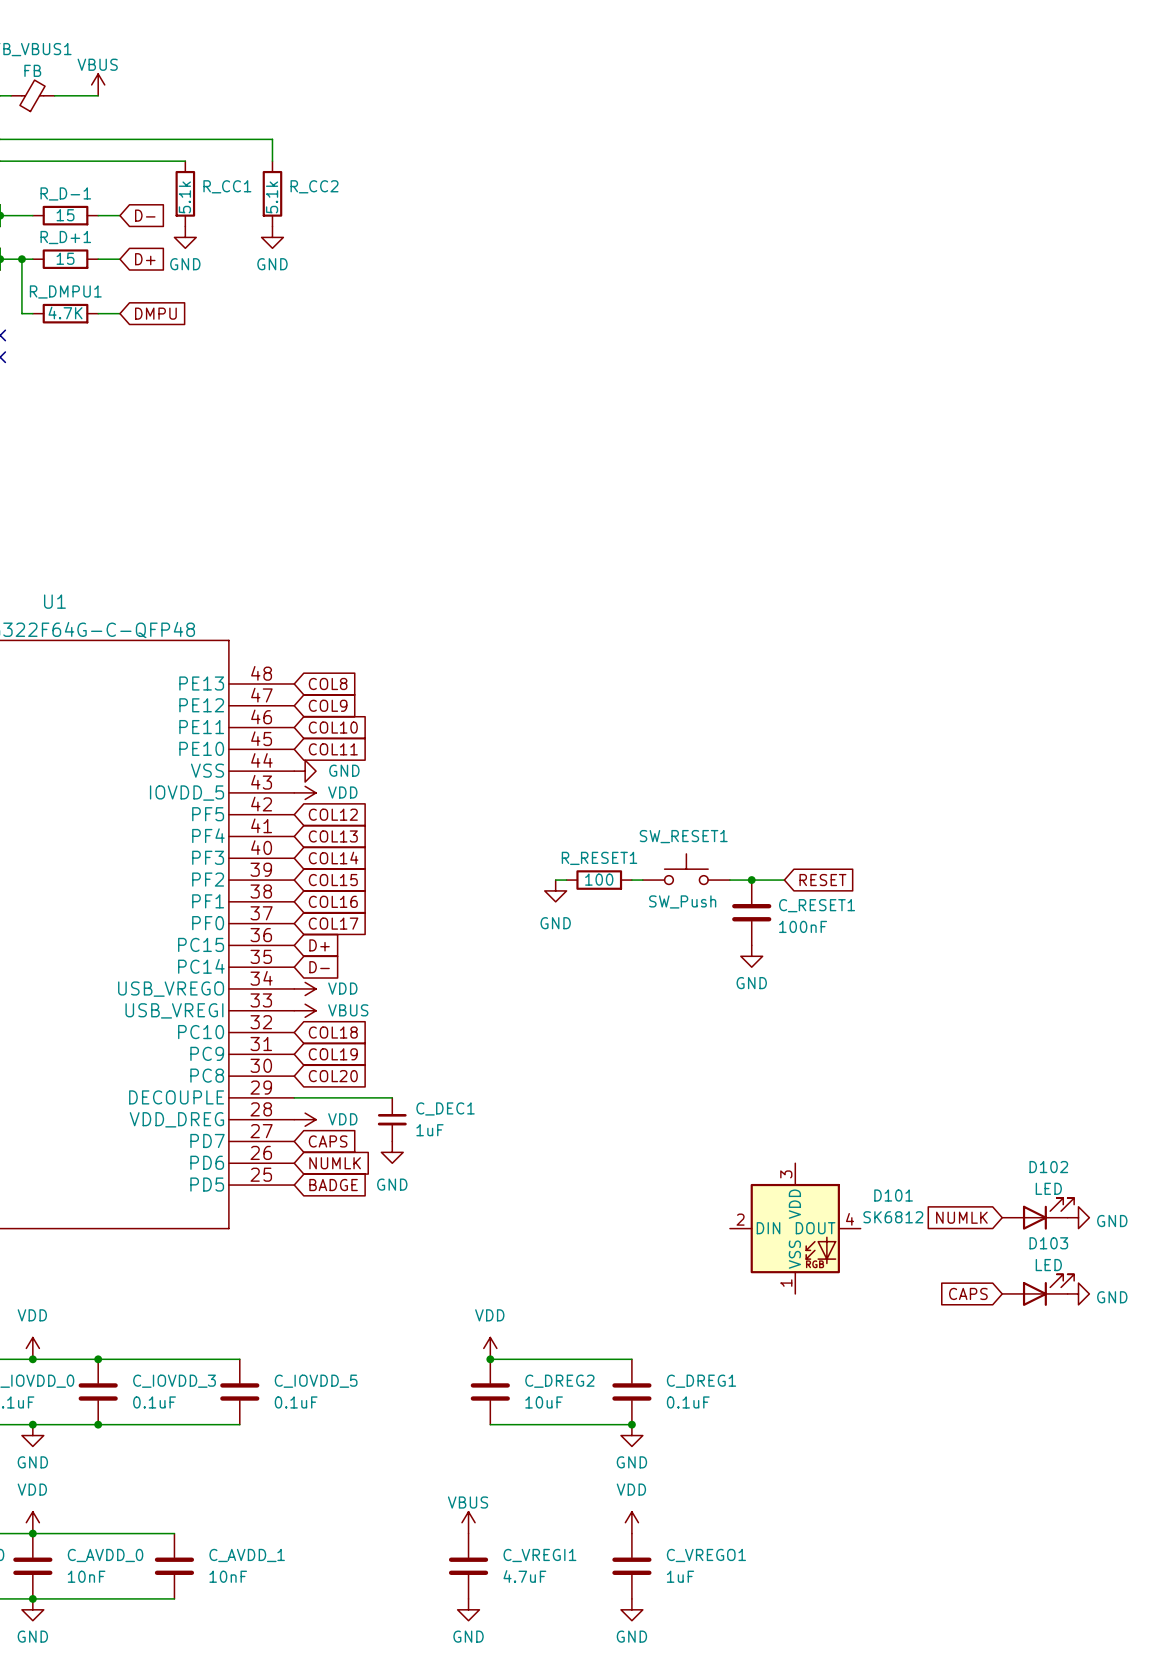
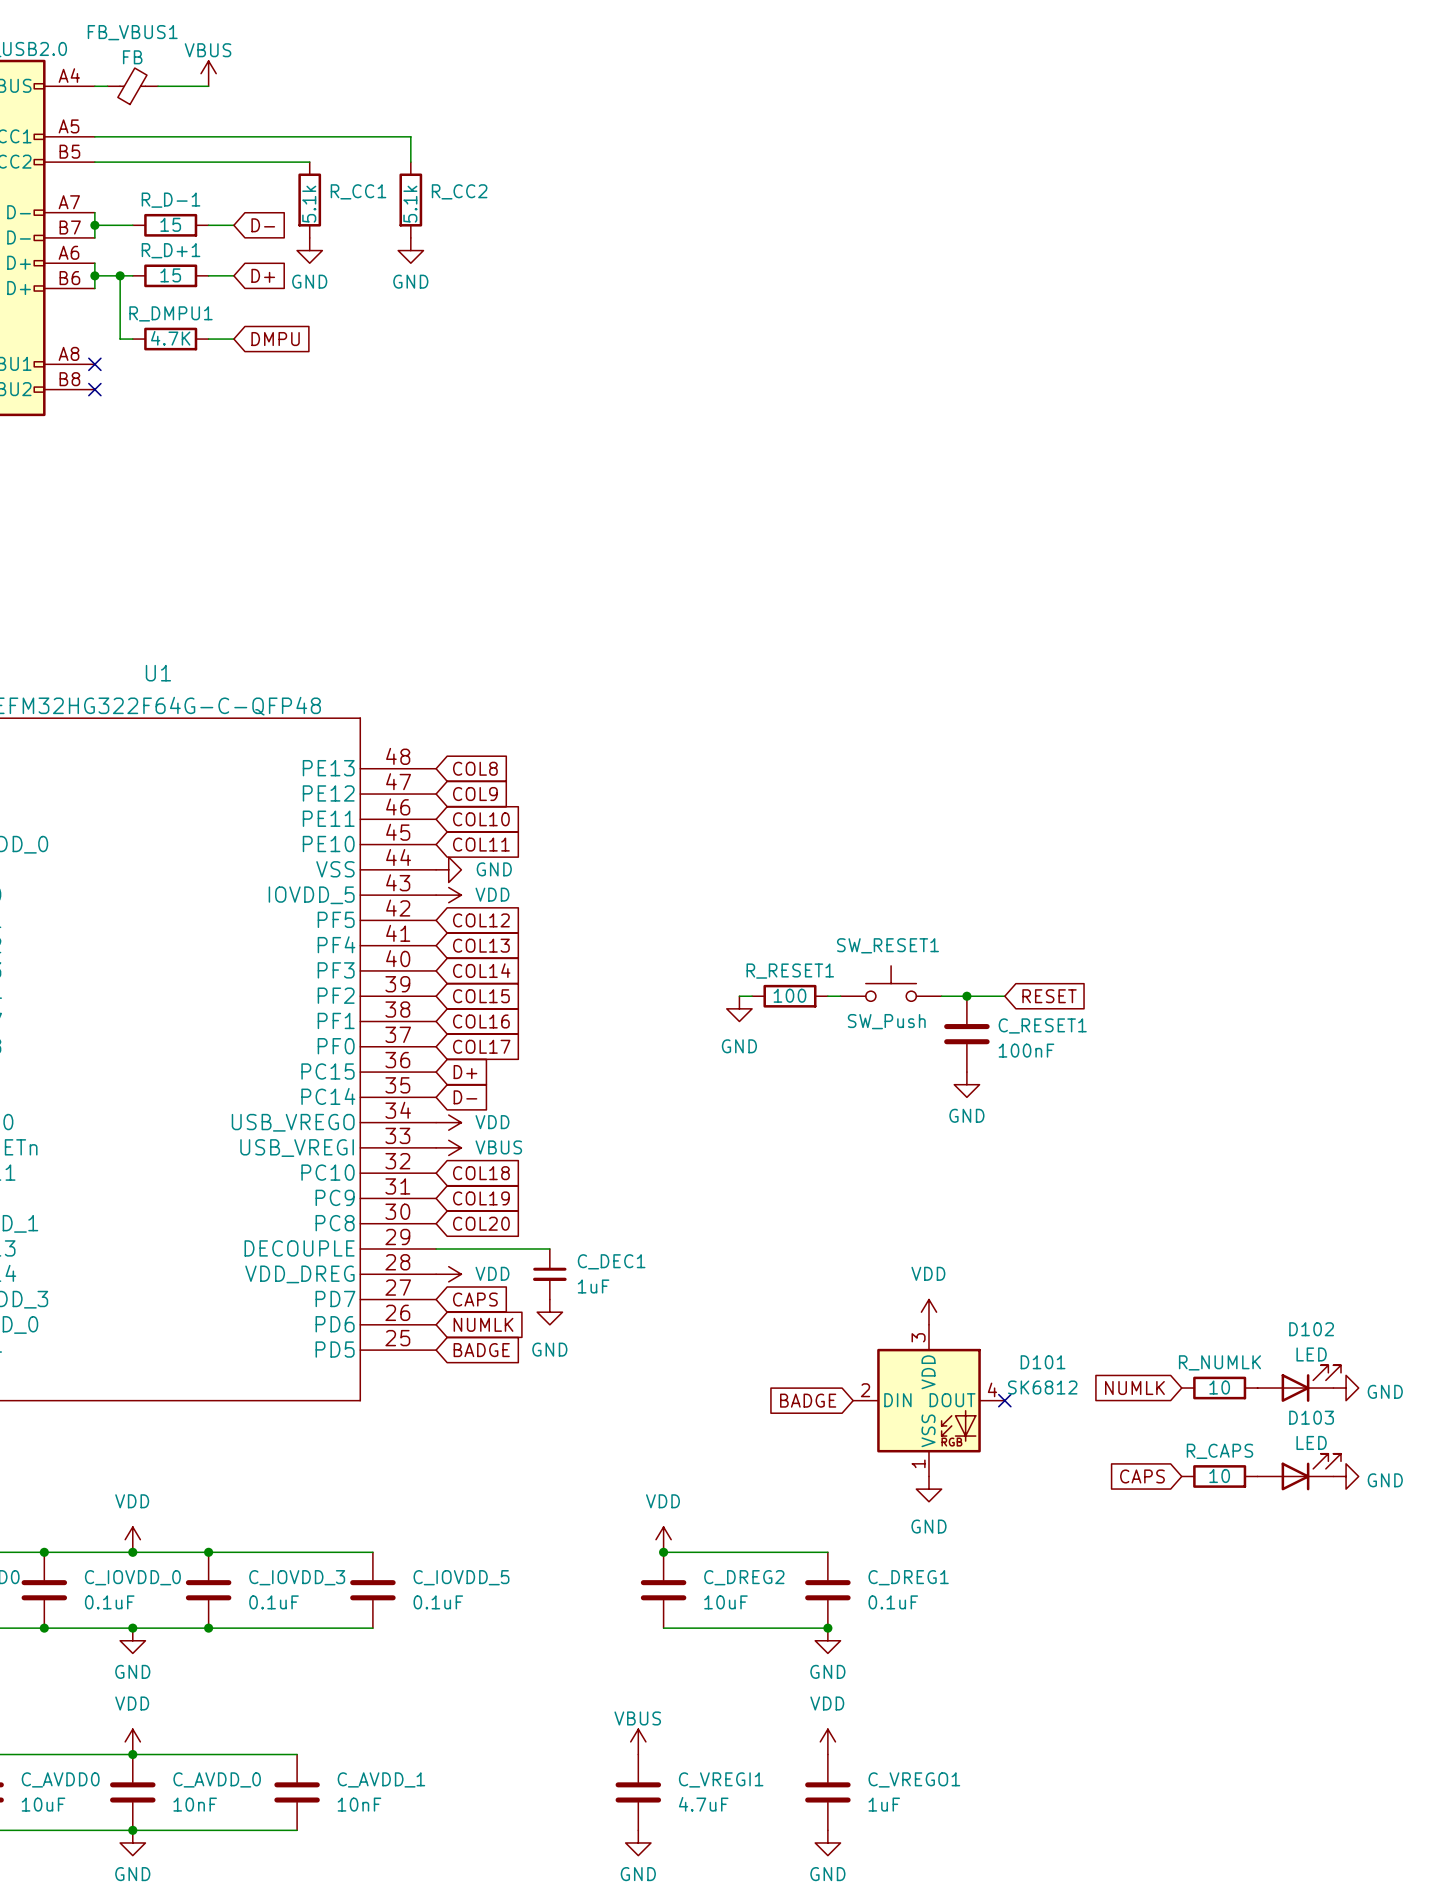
power symbol: none -> VDD (928, 1312)
global label position: NUMLK (961, 1217) -> NUMLK (1134, 1388)
R_NUMLK: none -> 10 (1219, 1388)
global label: none -> BADGE (808, 1400)
no-connect mark: none -> (1004, 1400)
D101 position: (795, 1228) -> (928, 1400)
global label position: CAPS (968, 1293) -> CAPS (1142, 1476)
R_CAPS: none -> 10 (1219, 1476)
power symbol: none -> GND (928, 1489)

